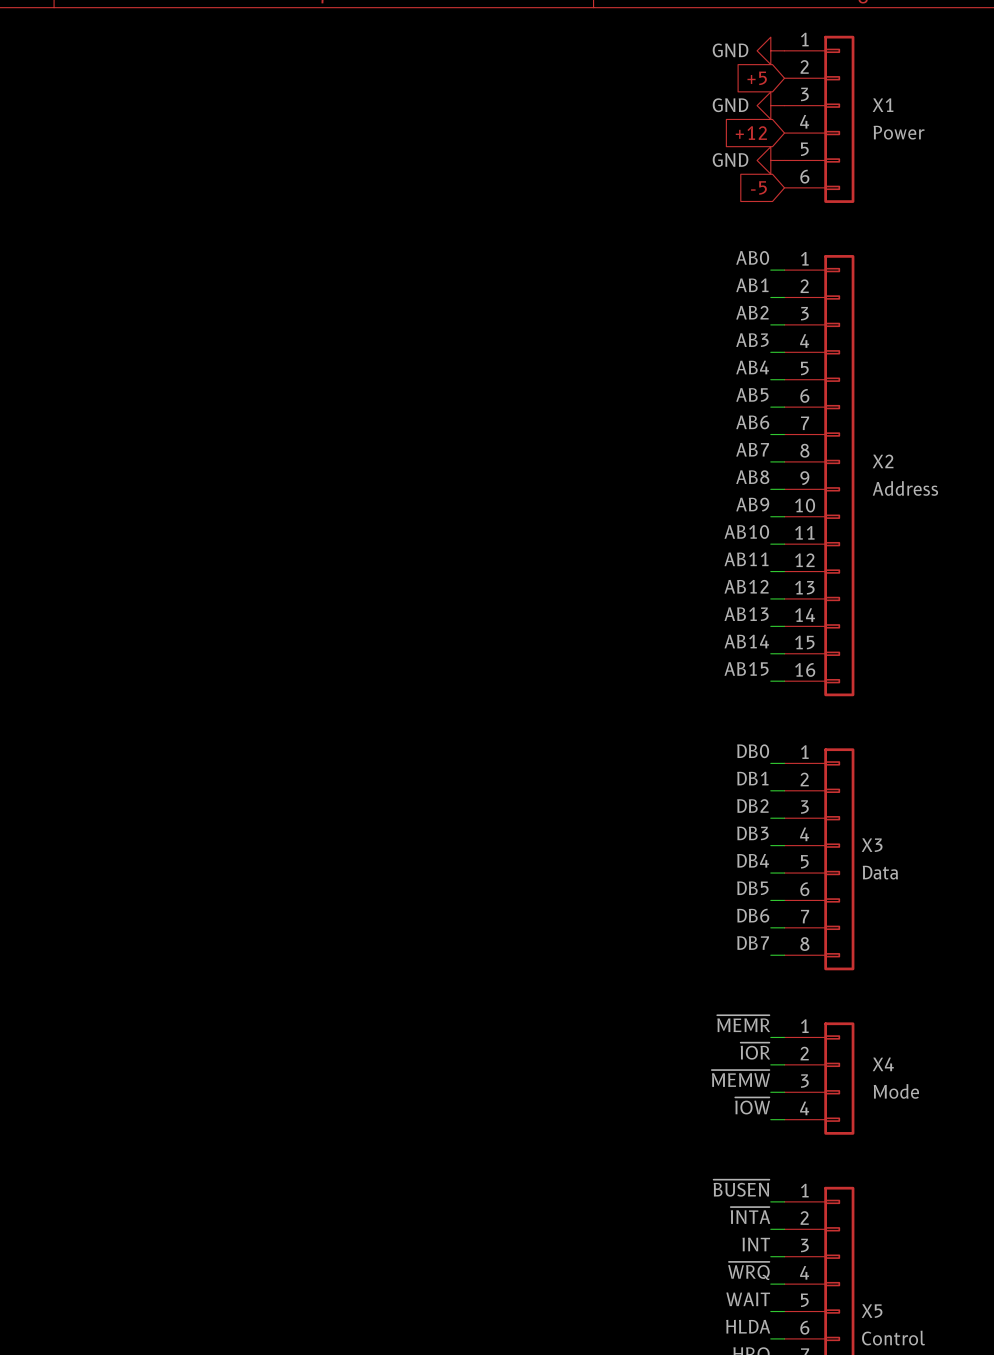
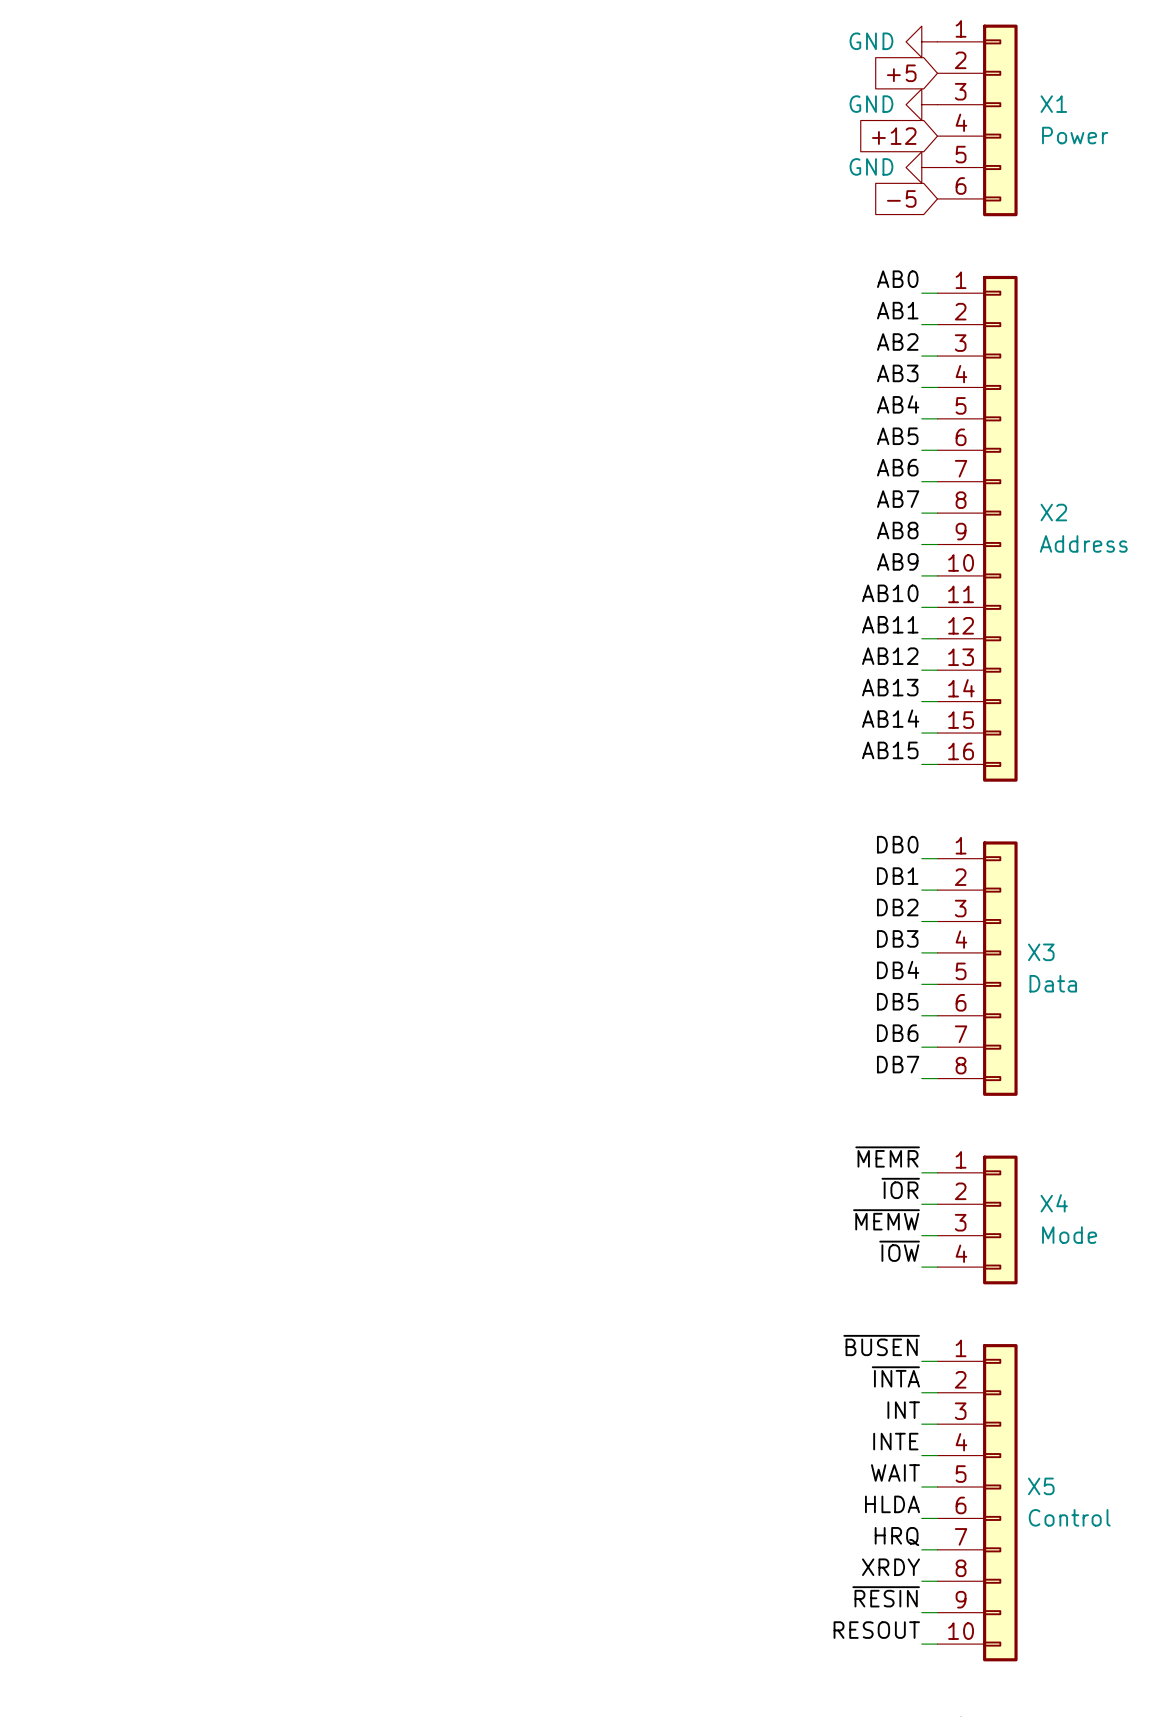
label: ~{WRQ} (748, 1270) -> INTE (895, 1441)

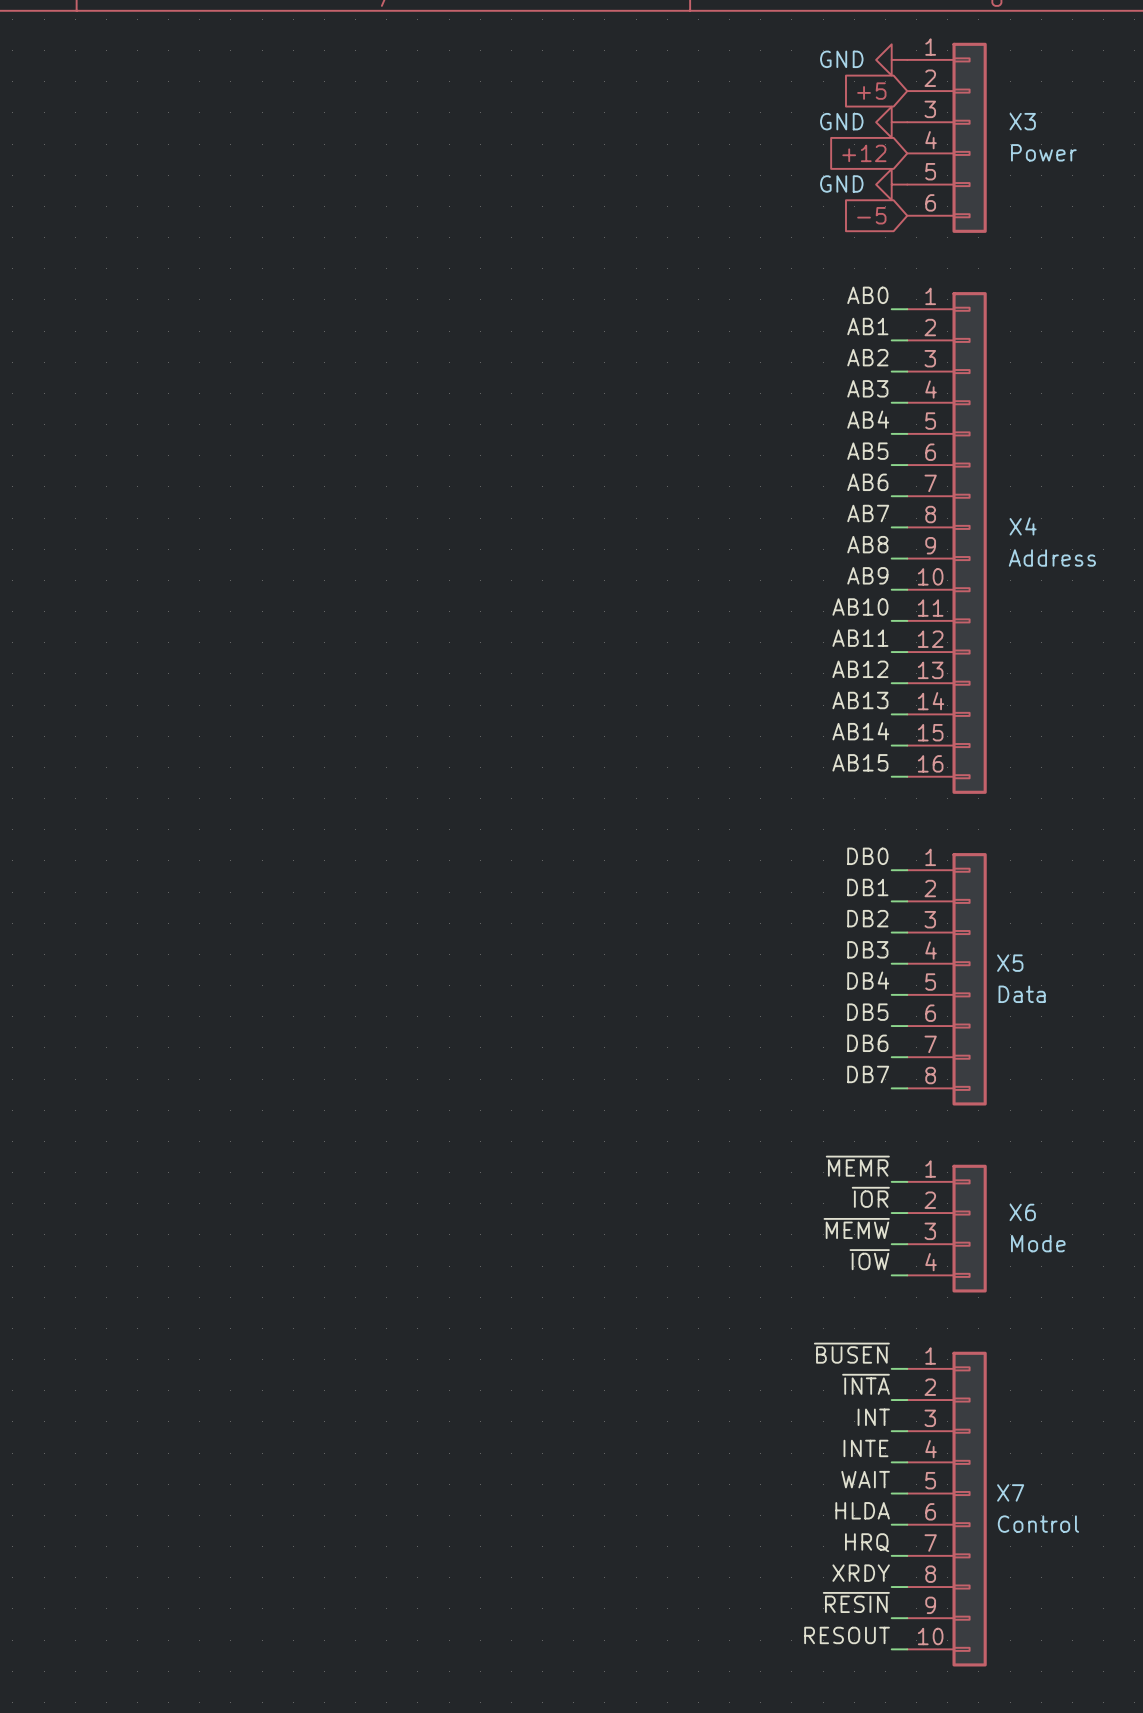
X1 name: X1 (1053, 104) -> X3 (1022, 121)
X2 name: X2 (1053, 512) -> X4 (1023, 526)
X3 name: X3 (1041, 952) -> X5 (1010, 963)
X4 name: X4 (1054, 1203) -> X6 (1022, 1212)
X5 name: X5 (1041, 1486) -> X7 (1010, 1492)

